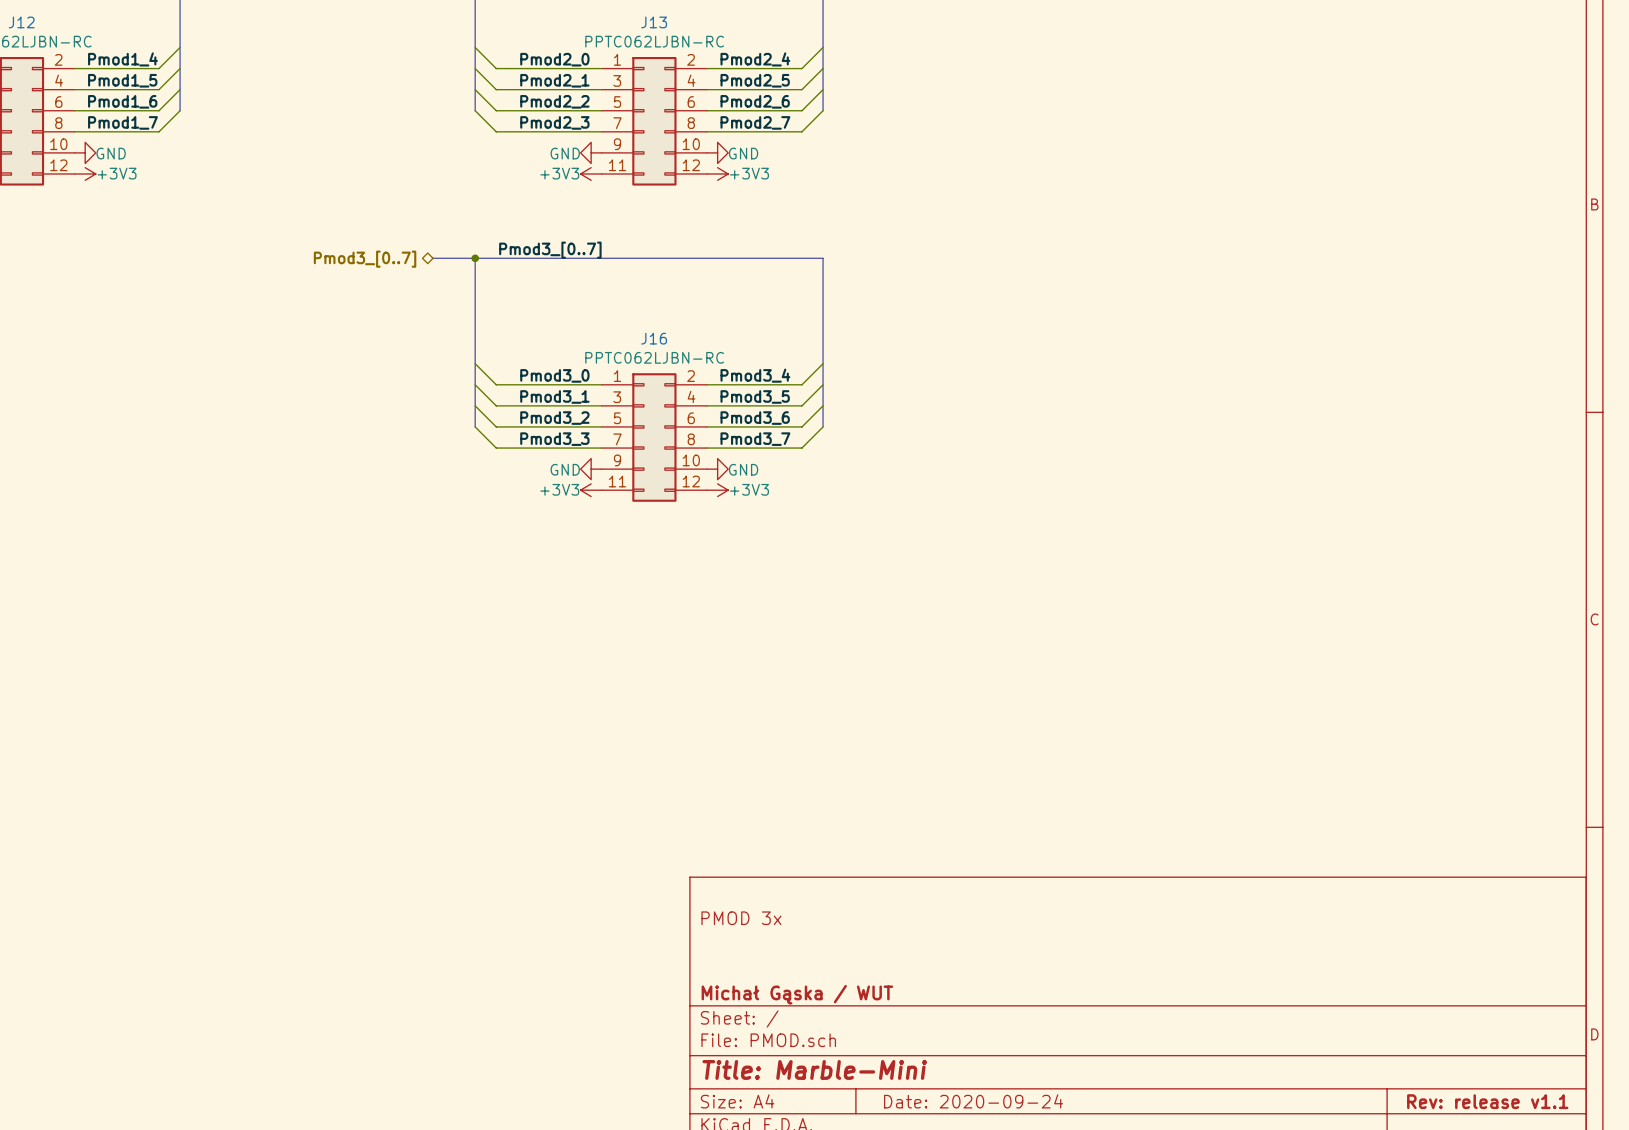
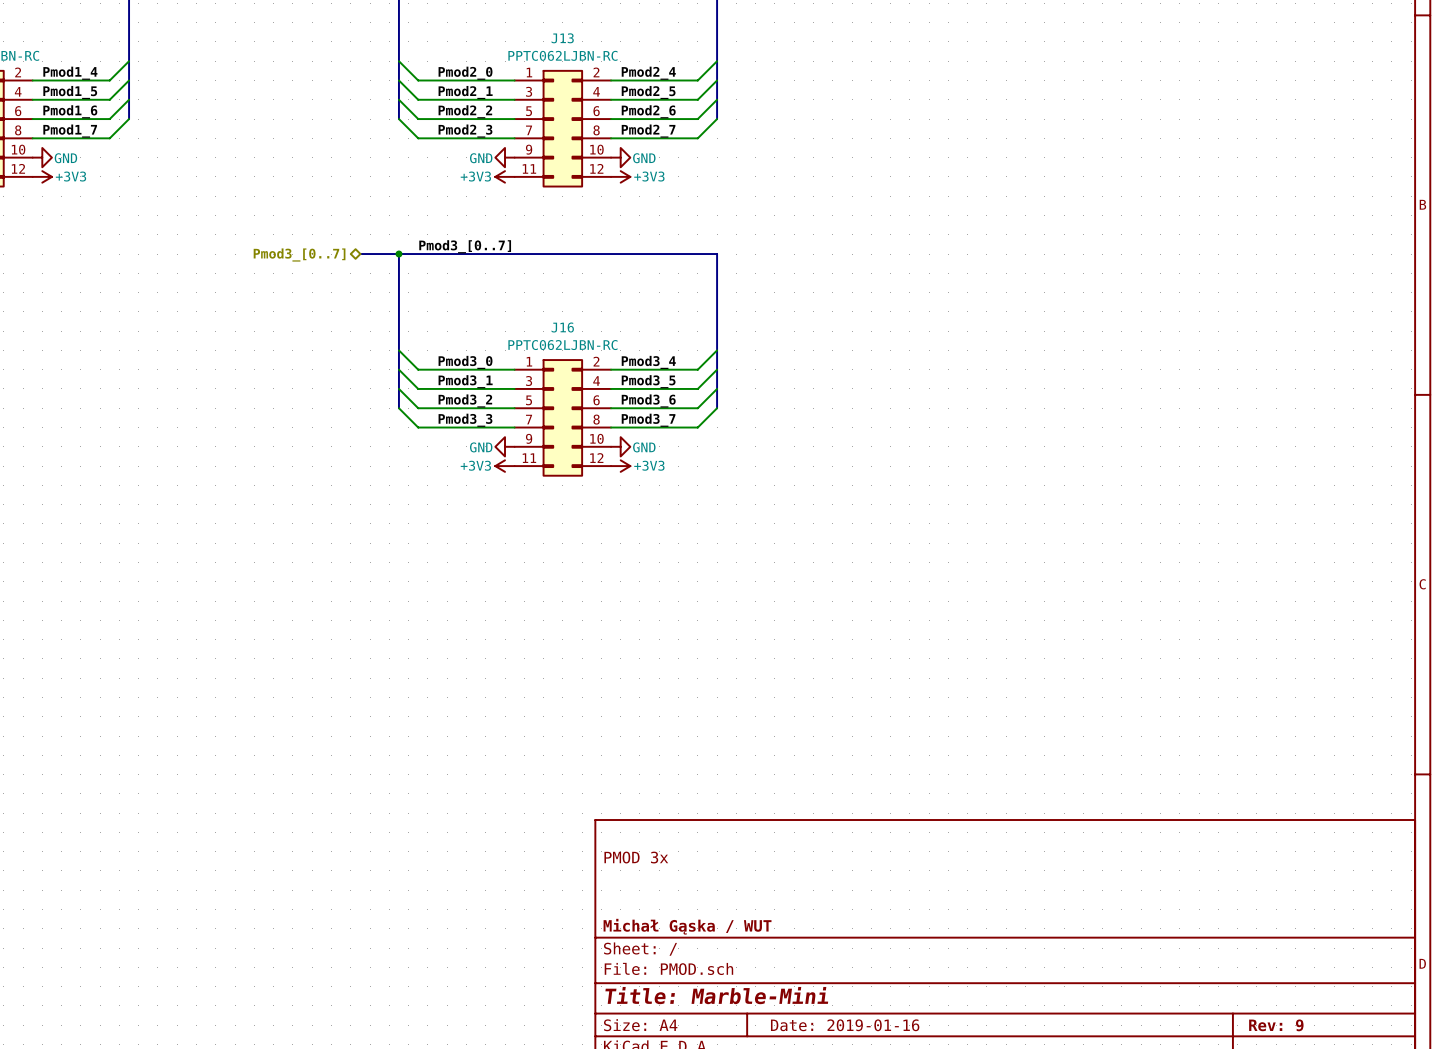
title block: Date: 2020-09-24 (973, 1101) -> Date: 2019-01-16 (845, 1025)
title block: Rev: release v1.1 (1487, 1101) -> Rev: 9 (1276, 1025)

